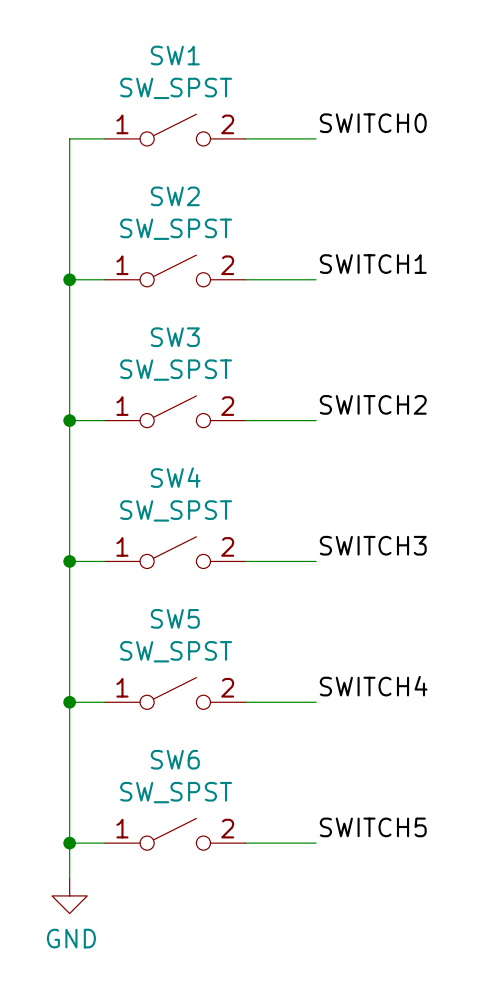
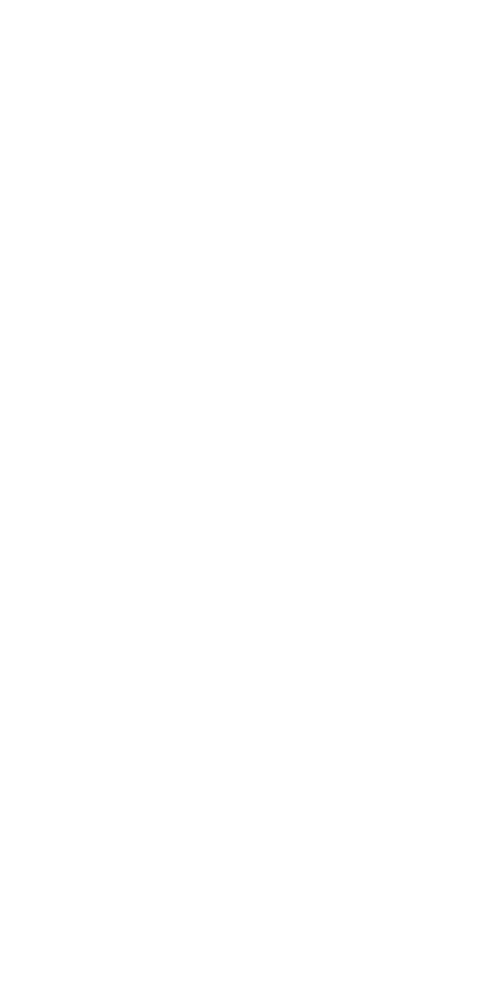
label: SWITCH0 (373, 123) -> none
SW1: SW_SPST (175, 130) -> none
wire: (104, 138) (69, 138) (69, 878) -> none
wire: (245, 138) (316, 138) -> none
label: SWITCH1 (373, 264) -> none
SW2: SW_SPST (175, 270) -> none
wire: (69, 279) (104, 279) -> none
junction: (69, 279) -> none
wire: (245, 279) (316, 279) -> none
label: SWITCH2 (373, 404) -> none
SW3: SW_SPST (175, 411) -> none
wire: (69, 420) (104, 420) -> none
junction: (69, 420) -> none
wire: (245, 420) (316, 420) -> none
label: SWITCH3 (373, 545) -> none
SW4: SW_SPST (175, 552) -> none
wire: (69, 561) (104, 561) -> none
junction: (69, 561) -> none
wire: (245, 561) (316, 561) -> none
label: SWITCH4 (373, 686) -> none
SW5: SW_SPST (175, 693) -> none
wire: (69, 702) (104, 702) -> none
junction: (69, 702) -> none
wire: (245, 702) (316, 702) -> none
label: SWITCH5 (373, 827) -> none
SW6: SW_SPST (175, 834) -> none
wire: (69, 843) (104, 843) -> none
junction: (69, 843) -> none
wire: (245, 843) (316, 843) -> none
power symbol: GND (69, 895) -> none

